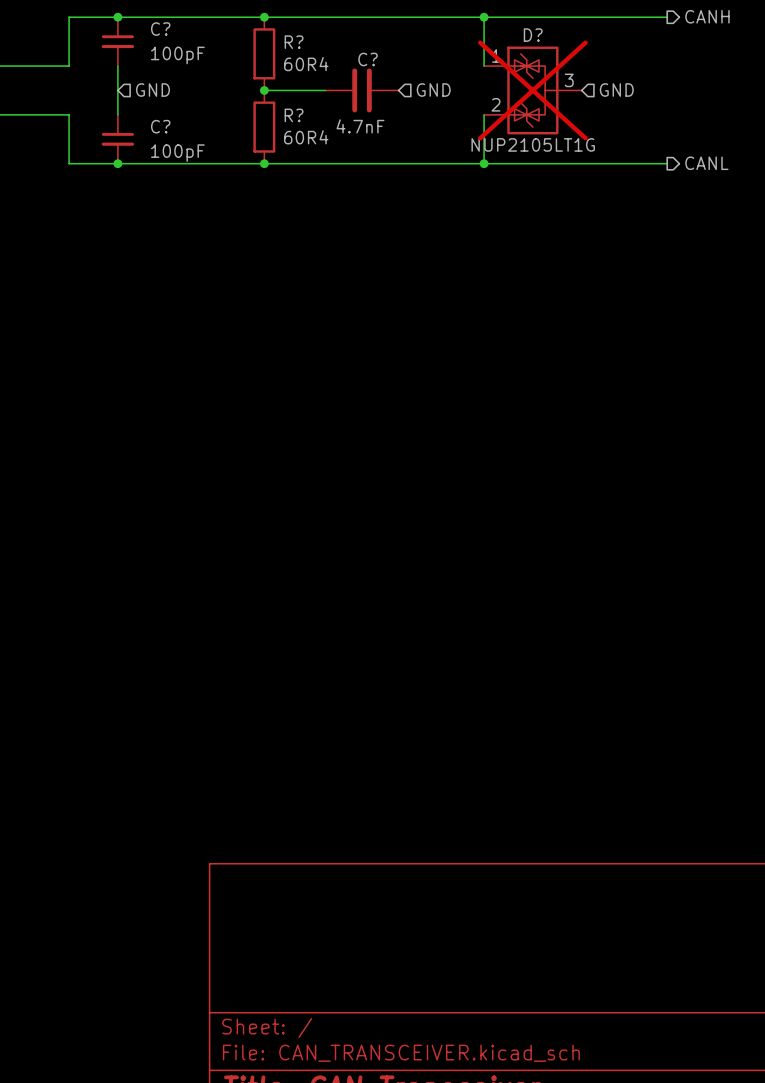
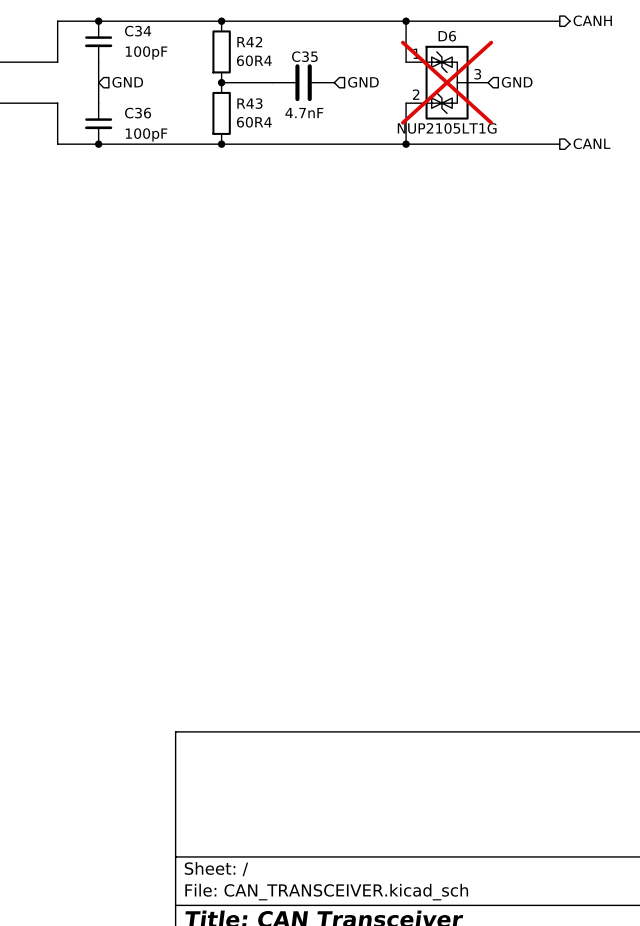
C? name: C? (160, 29) -> C34 (138, 31)
D? name: D? (533, 35) -> D6 (447, 36)
R? name: R? (294, 42) -> R42 (249, 42)
C? name: C? (368, 59) -> C35 (304, 56)
R? name: R? (294, 115) -> R43 (249, 103)
C? name: C? (160, 126) -> C36 (138, 113)

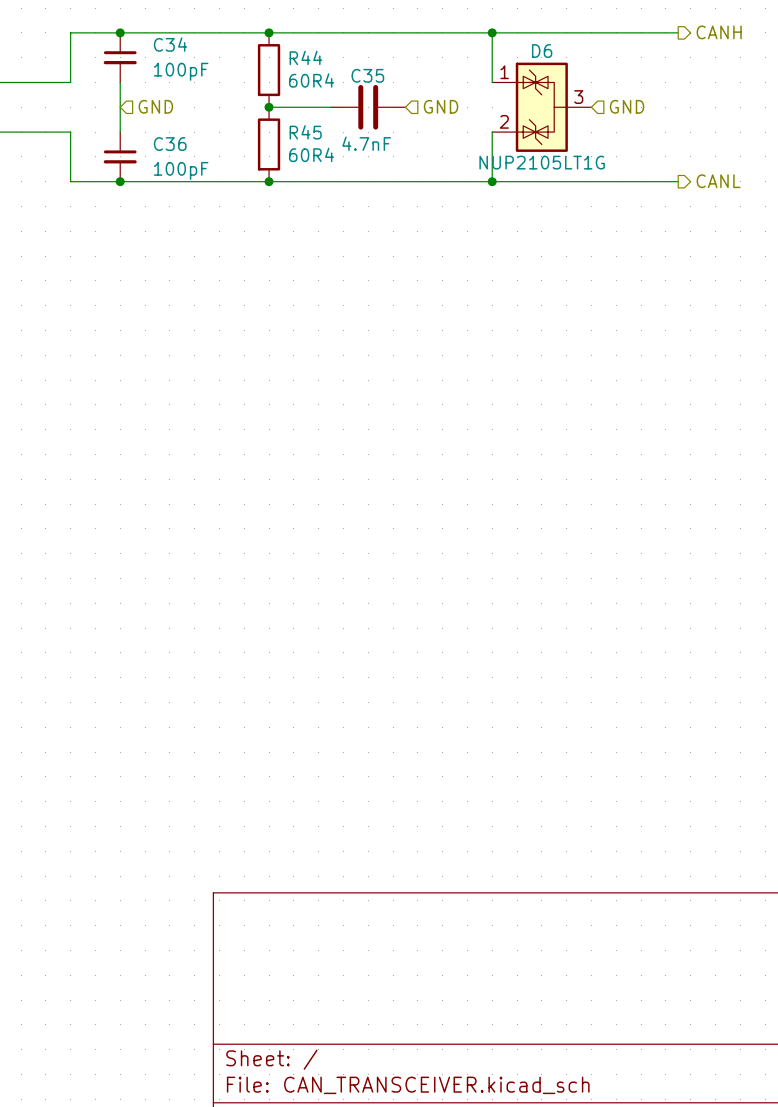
R42 name: R42 (249, 42) -> R44 (305, 57)
D6 do-not-place cross: (447, 82) -> none
R43 name: R43 (249, 103) -> R45 (305, 132)

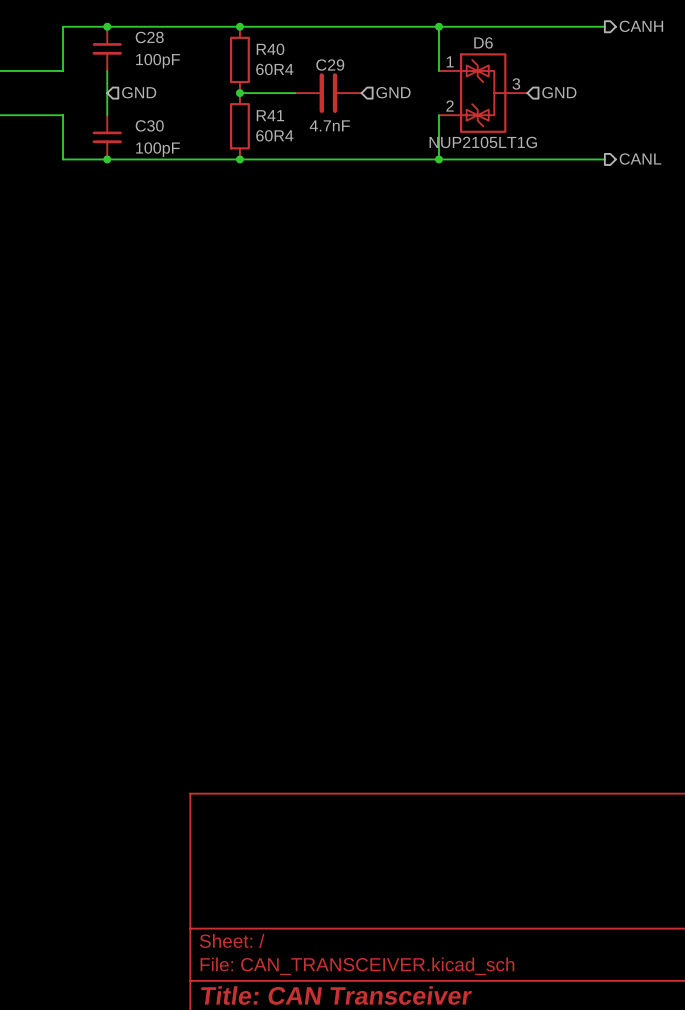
C34 name: C34 (170, 44) -> C28 (149, 37)
R44 name: R44 (305, 57) -> R40 (270, 49)
C35 name: C35 (367, 75) -> C29 (330, 65)
R45 name: R45 (305, 132) -> R41 (270, 115)
C36 name: C36 (170, 144) -> C30 (149, 125)

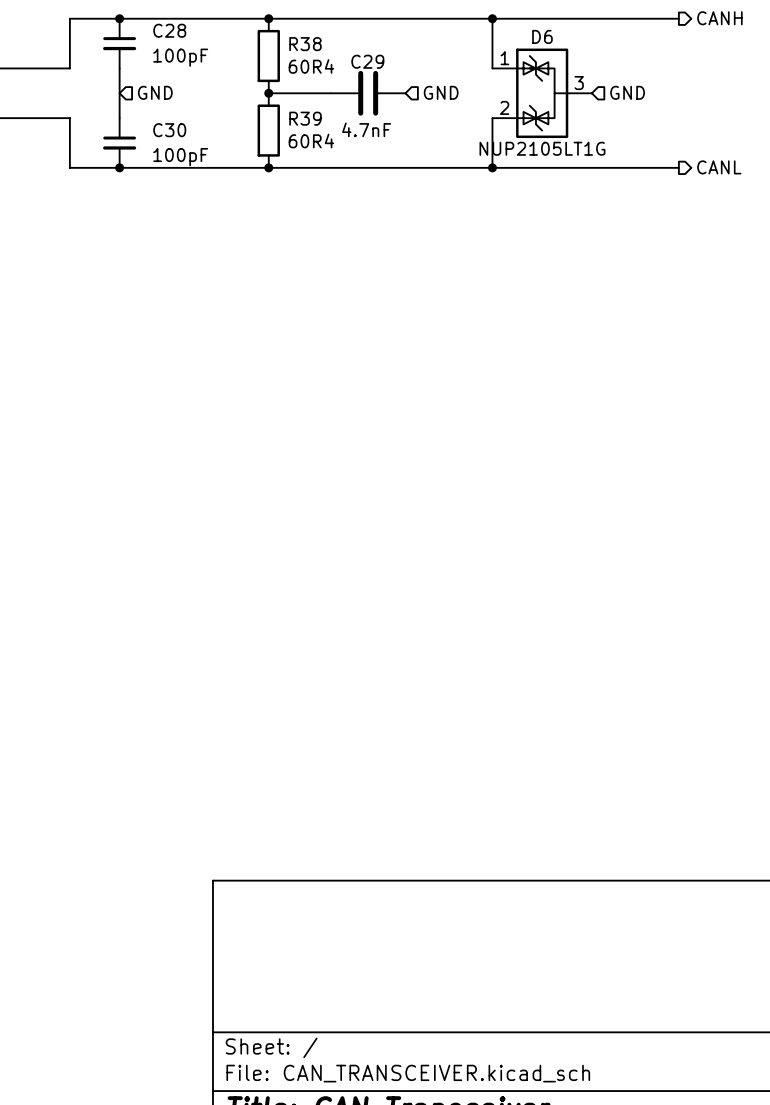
R40 name: R40 (270, 49) -> R38 (305, 44)
R41 name: R41 (270, 115) -> R39 (305, 118)

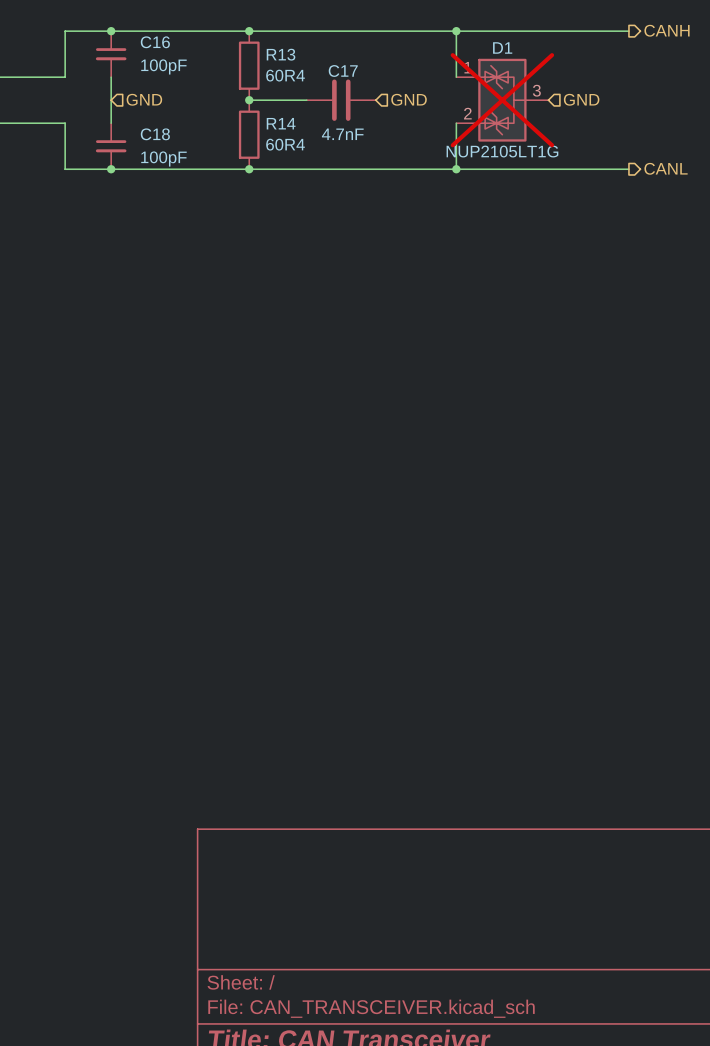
C28 name: C28 (169, 30) -> C16 (155, 42)
D6 name: D6 (542, 36) -> D1 (502, 47)
R38 name: R38 (305, 44) -> R13 (281, 54)
C29 name: C29 (367, 61) -> C17 (343, 71)
D6 do-not-place cross: none -> (502, 100)
R39 name: R39 (305, 118) -> R14 (281, 123)
C30 name: C30 (169, 130) -> C18 (155, 134)

